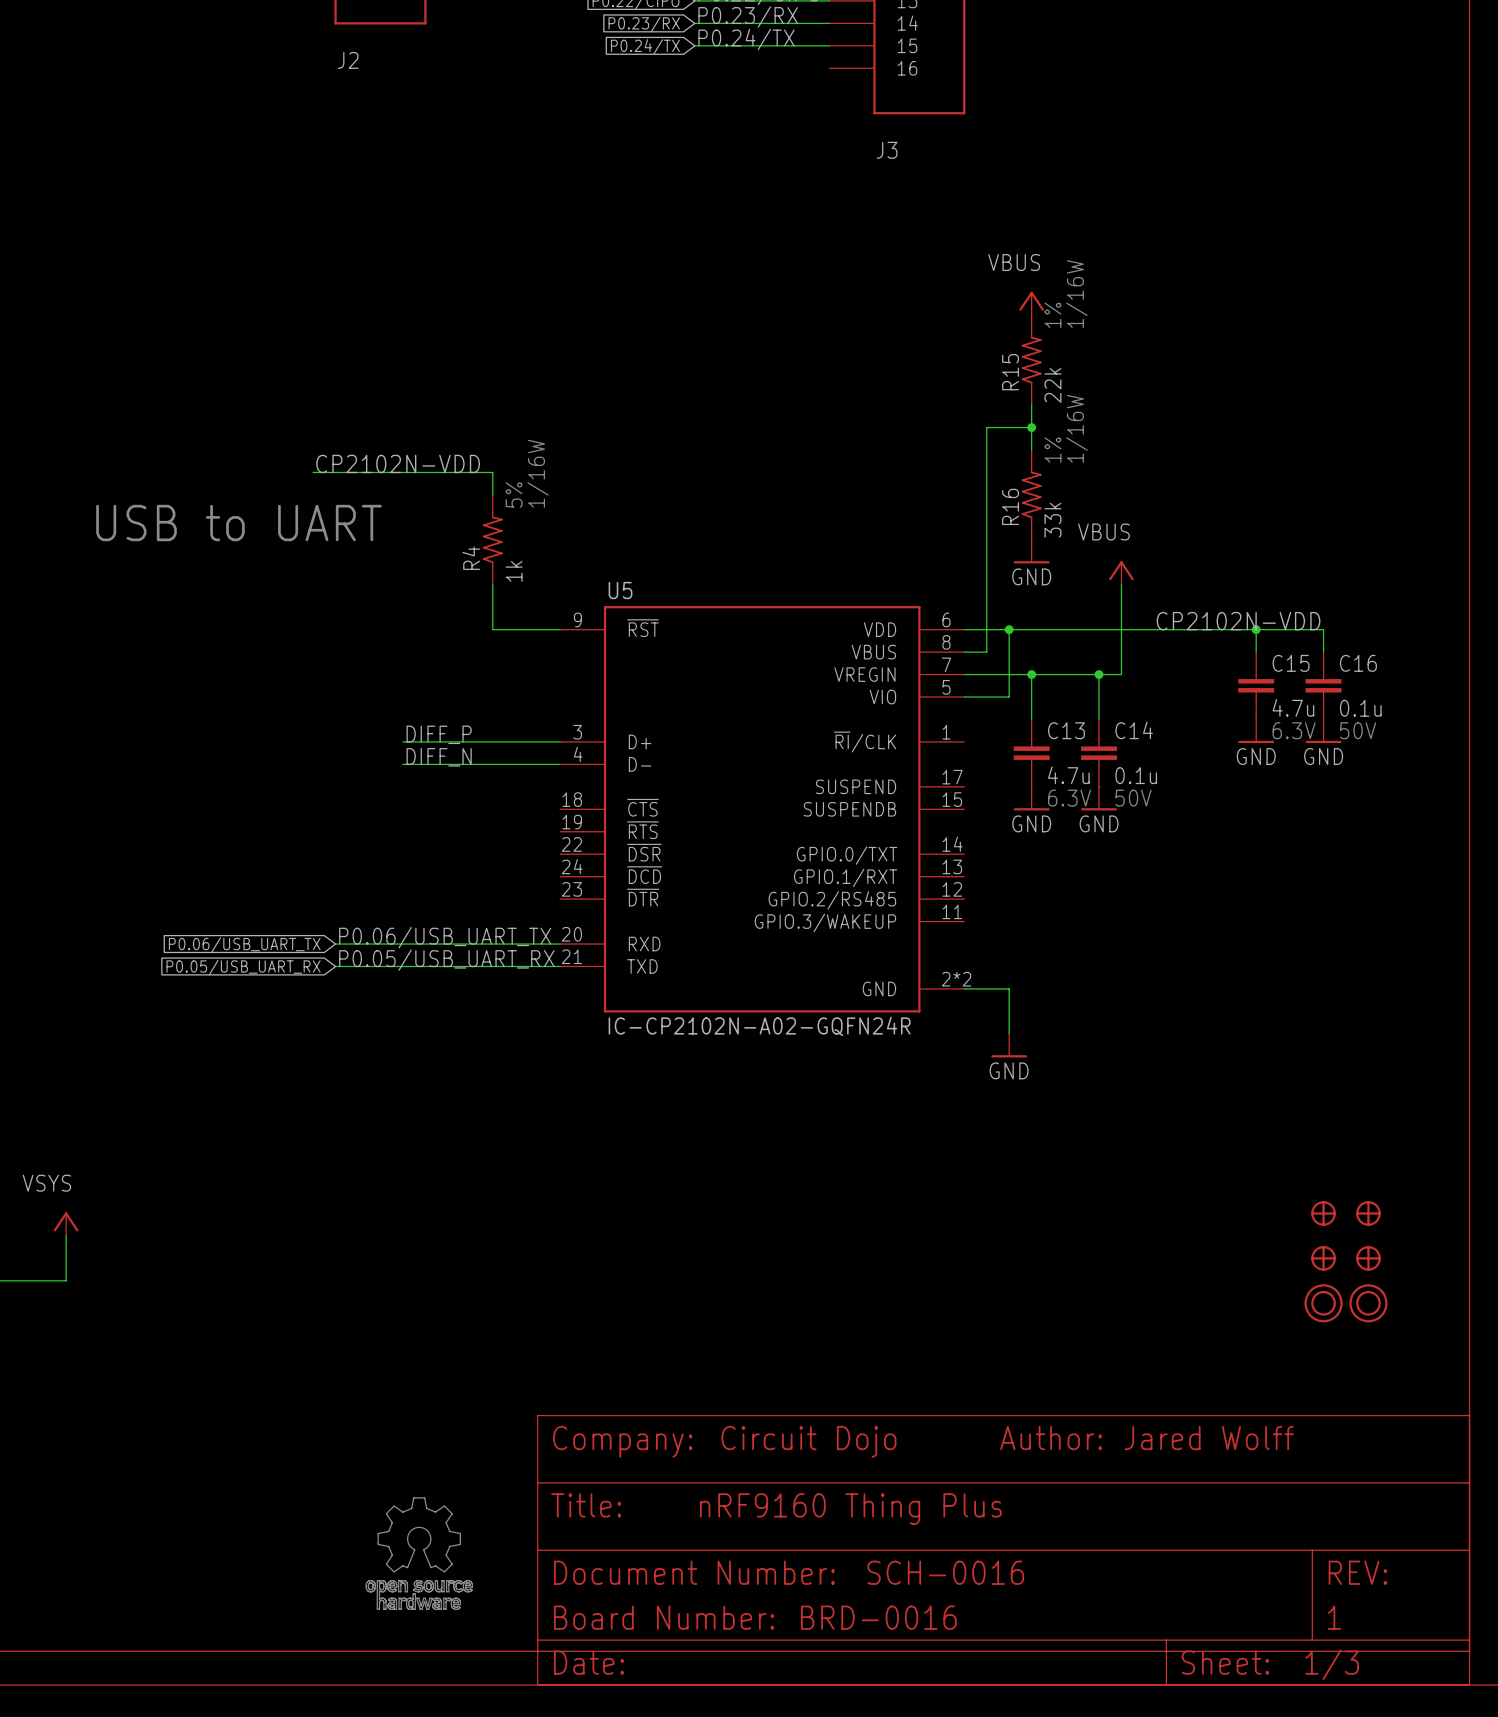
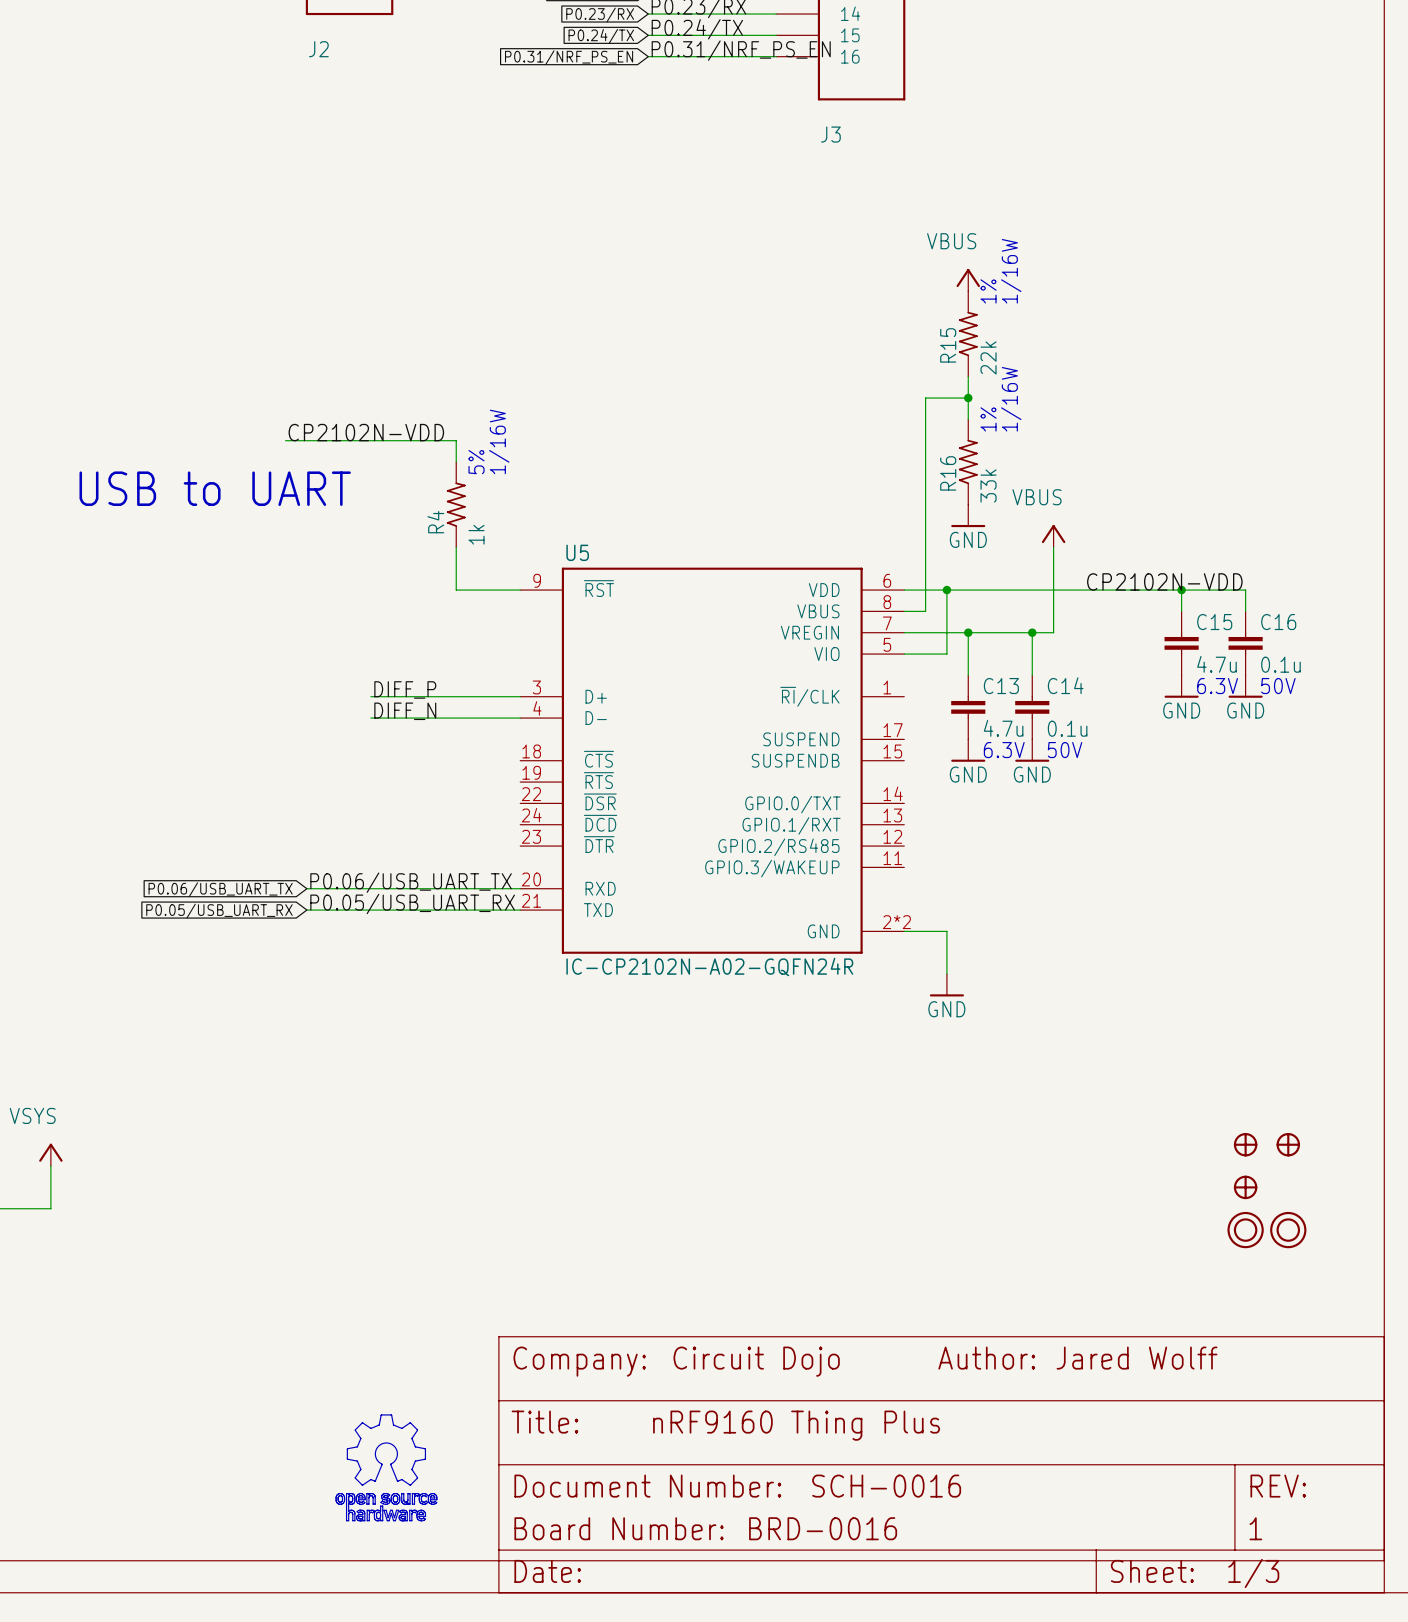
label: none -> P0.31/NRF_PS_EN (741, 50)
wire: none -> (648, 56) (776, 56)
global label: none -> P0.31/NRF_PS_EN (569, 57)
part: (1368, 1258) -> none

